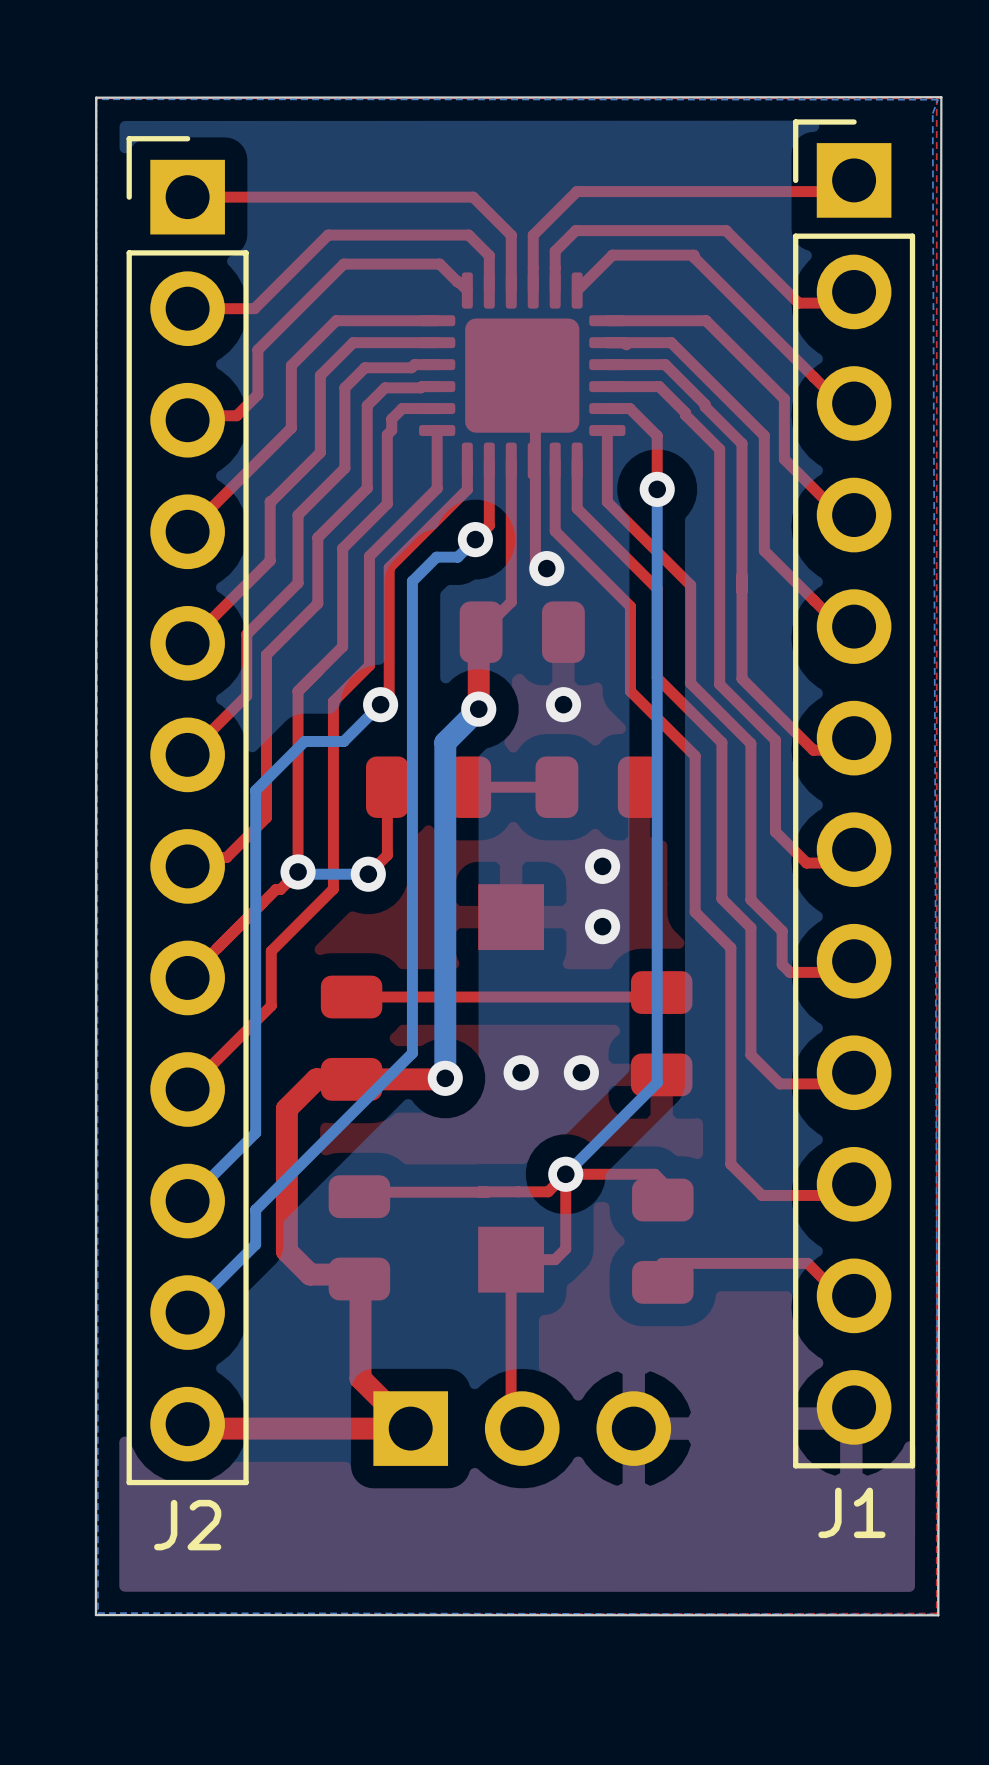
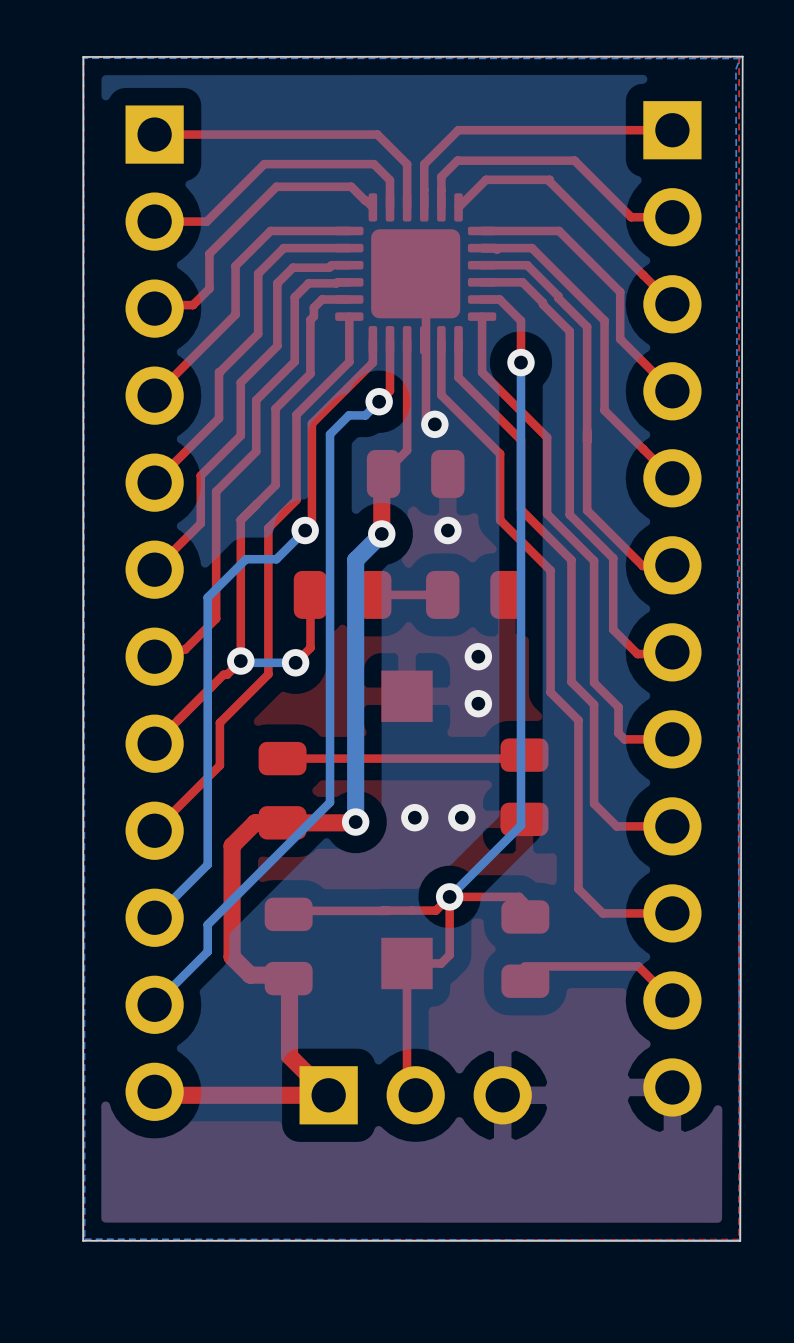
J1 side: bottom (854, 793) -> top (672, 608)
J2 side: bottom (187, 810) -> top (154, 613)

